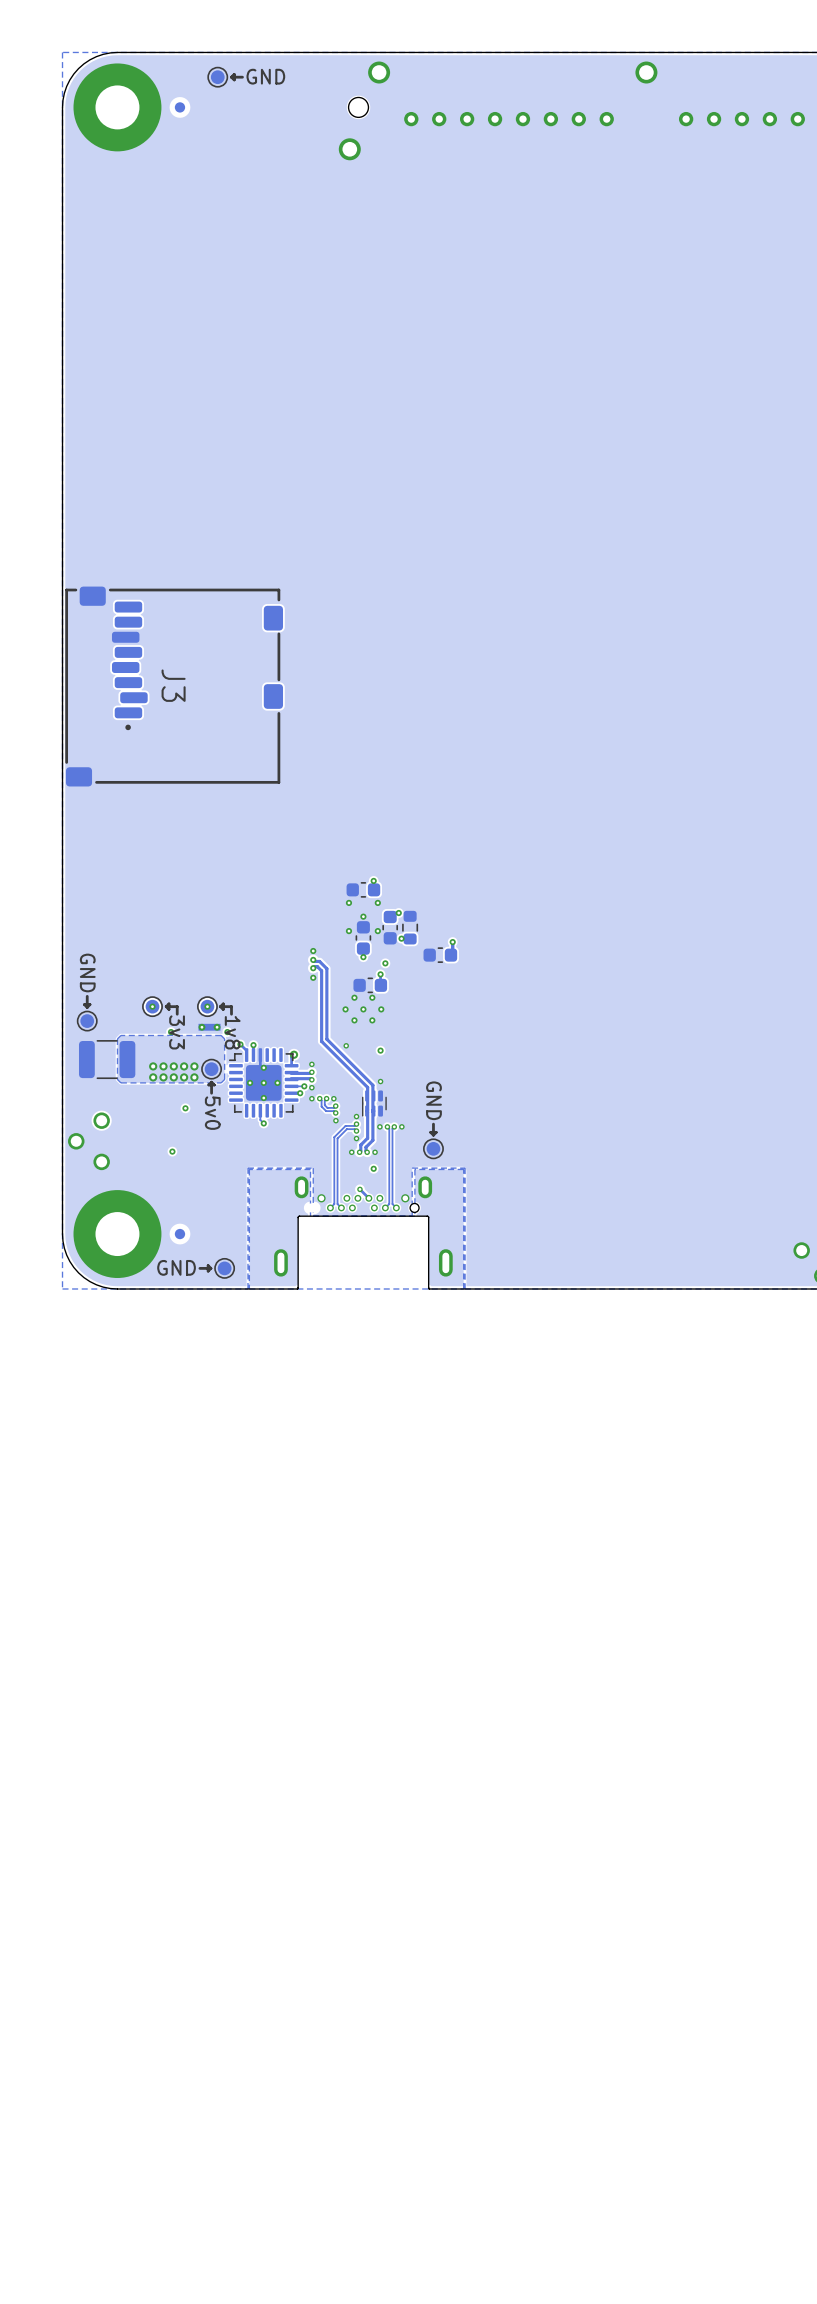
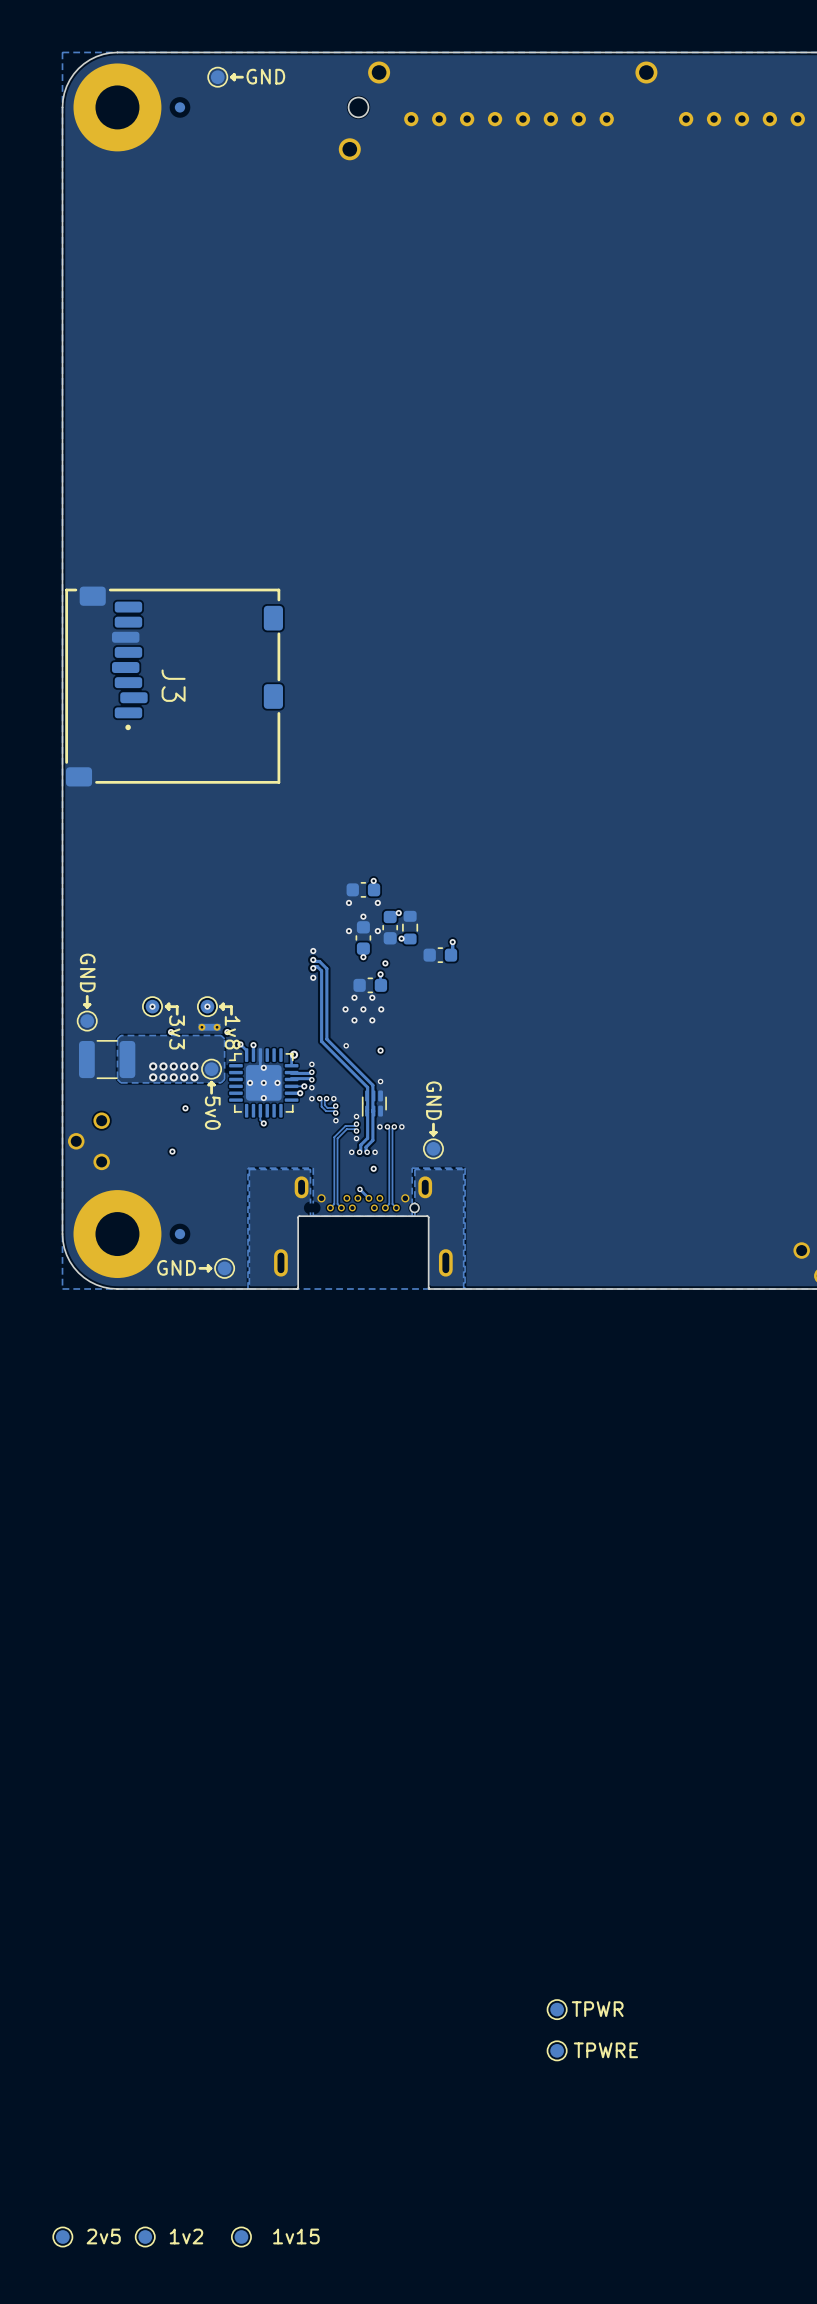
part: none -> TPWR (557, 2009)
part: none -> TPWRE (557, 2050)
part: none -> 2v5 (62, 2237)
part: none -> 1v2 (145, 2237)
part: none -> 1v15 (241, 2237)

